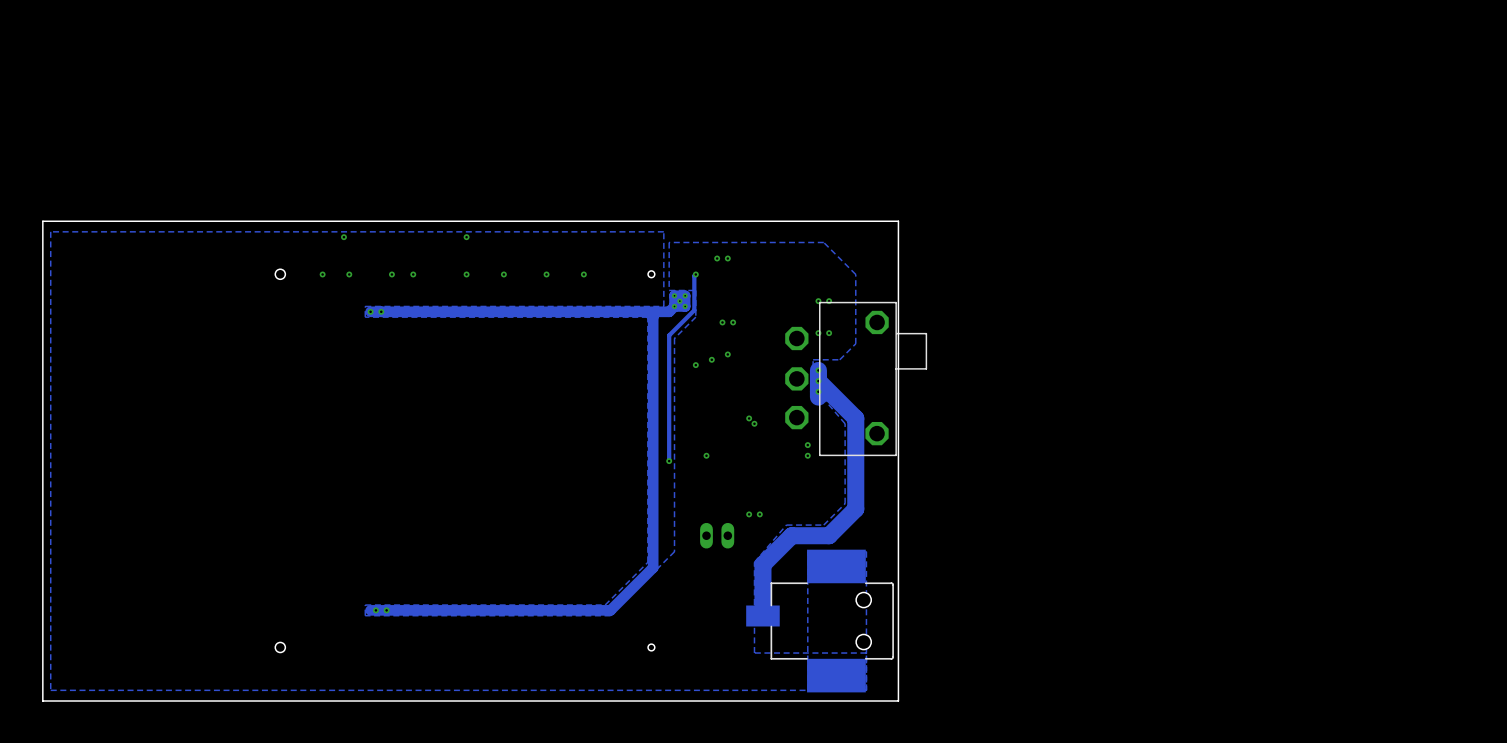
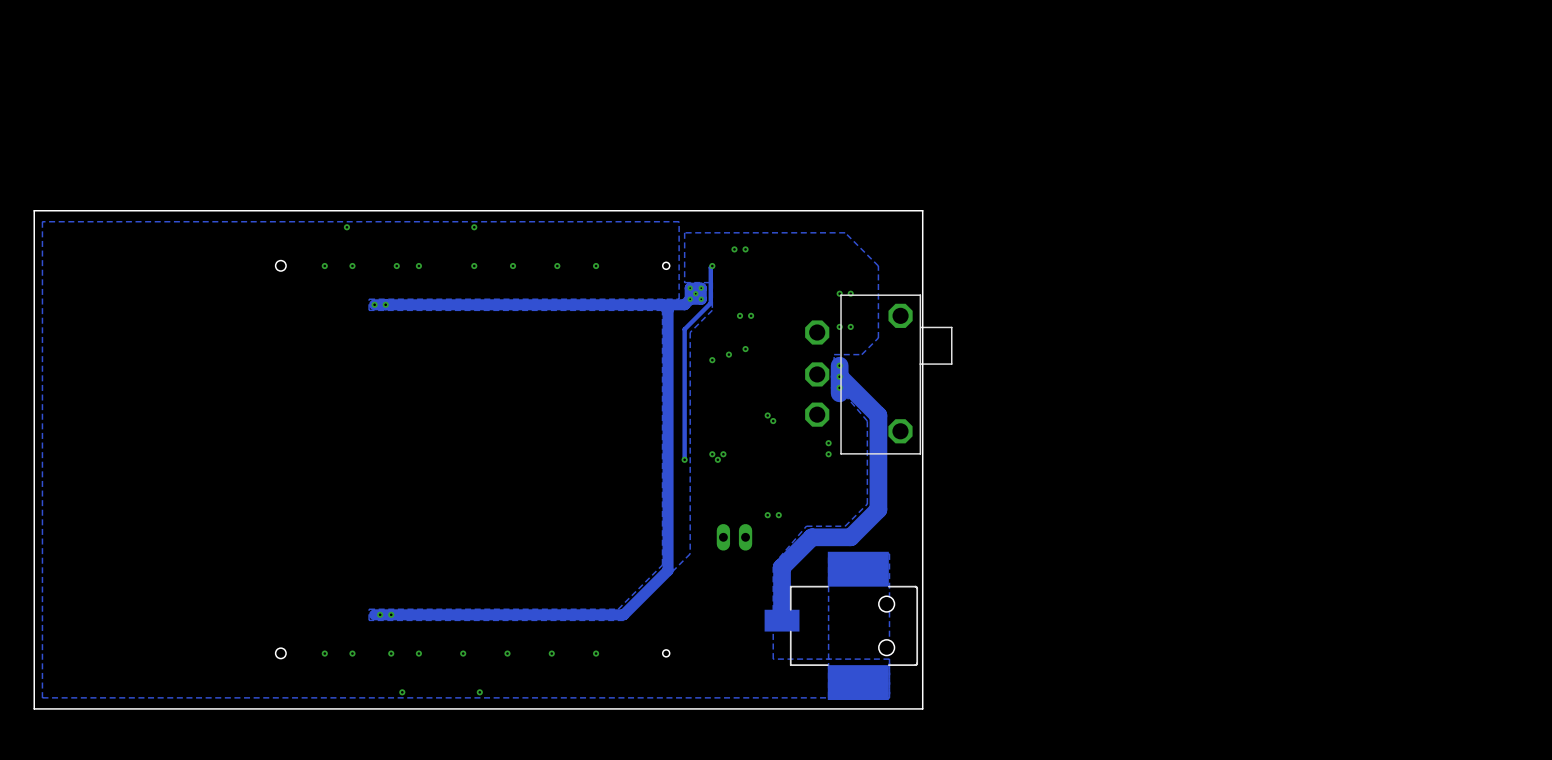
via: none -> (712, 454)
via: none -> (717, 459)
via: none -> (324, 653)
via: none -> (352, 653)
via: none -> (391, 653)
via: none -> (418, 653)
via: none -> (463, 653)
via: none -> (507, 653)
via: none -> (551, 653)
via: none -> (596, 653)
via: none -> (402, 692)
via: none -> (479, 692)

